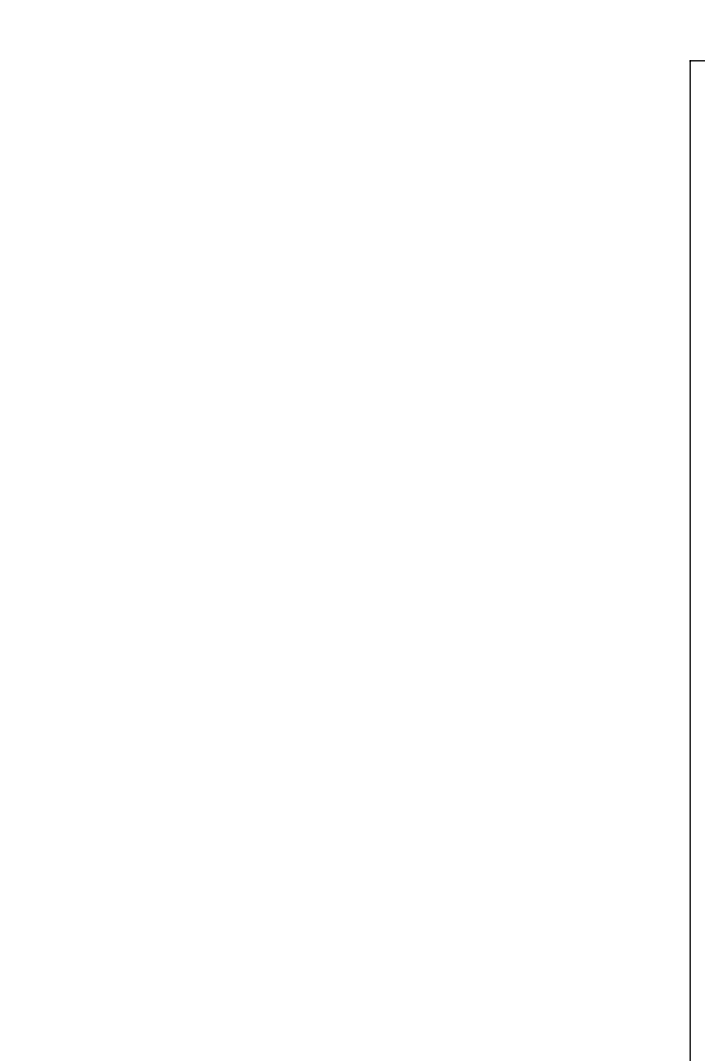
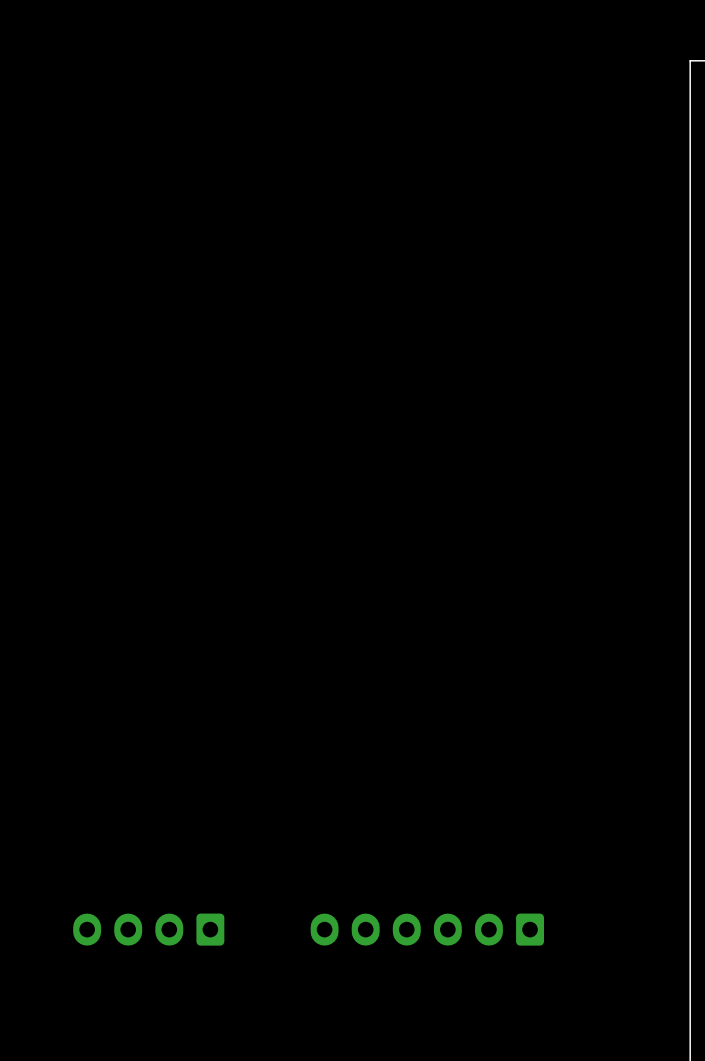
part: none -> (148, 929)
part: none -> (427, 929)

